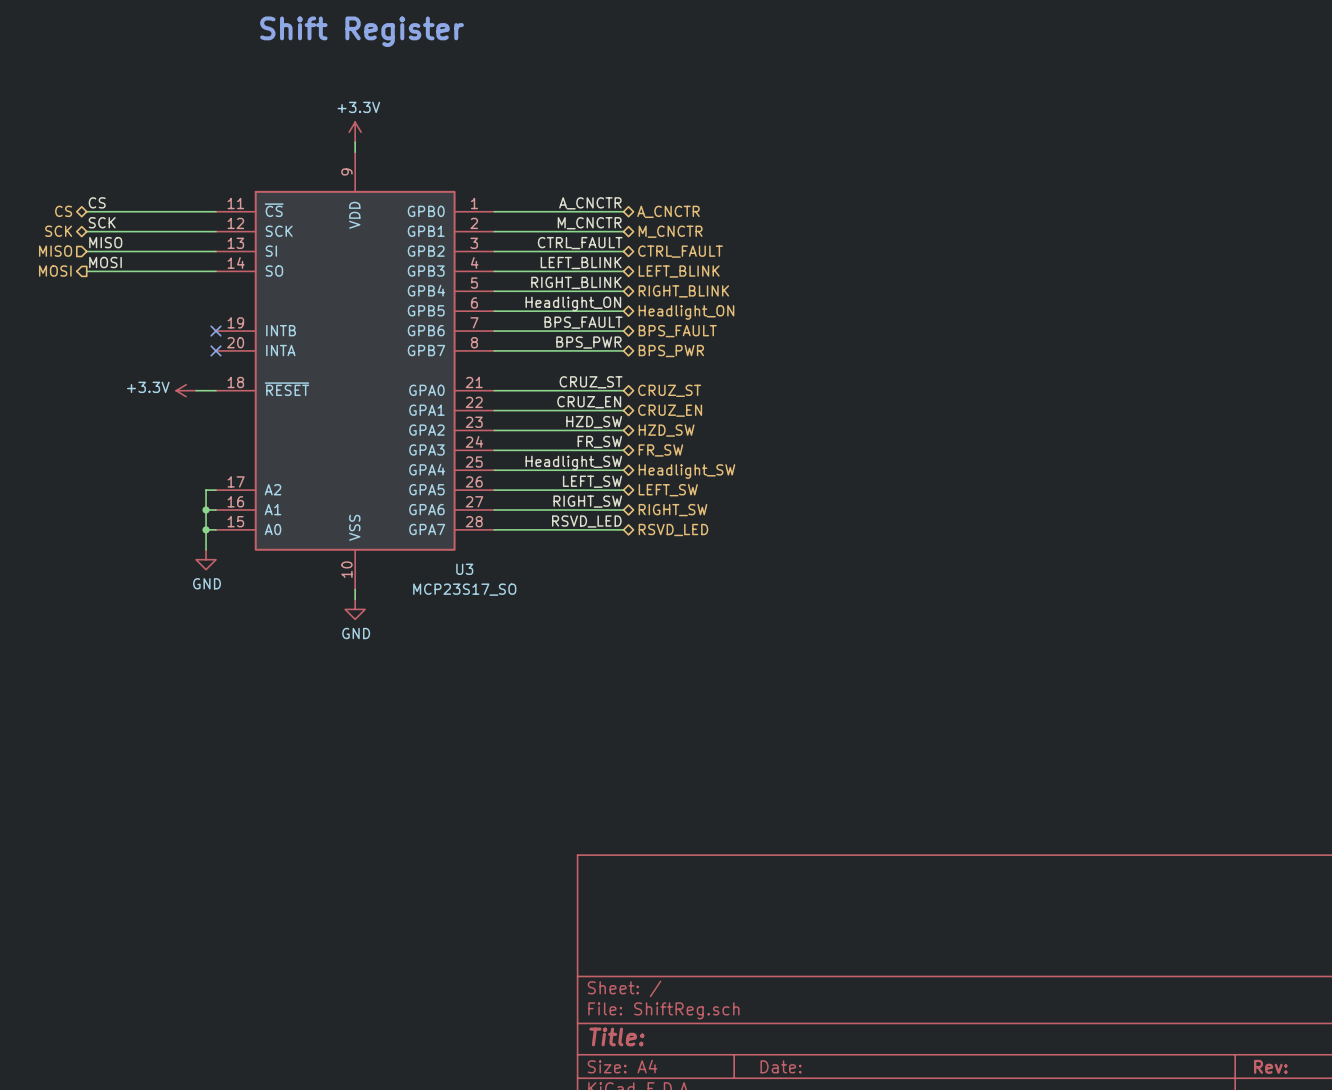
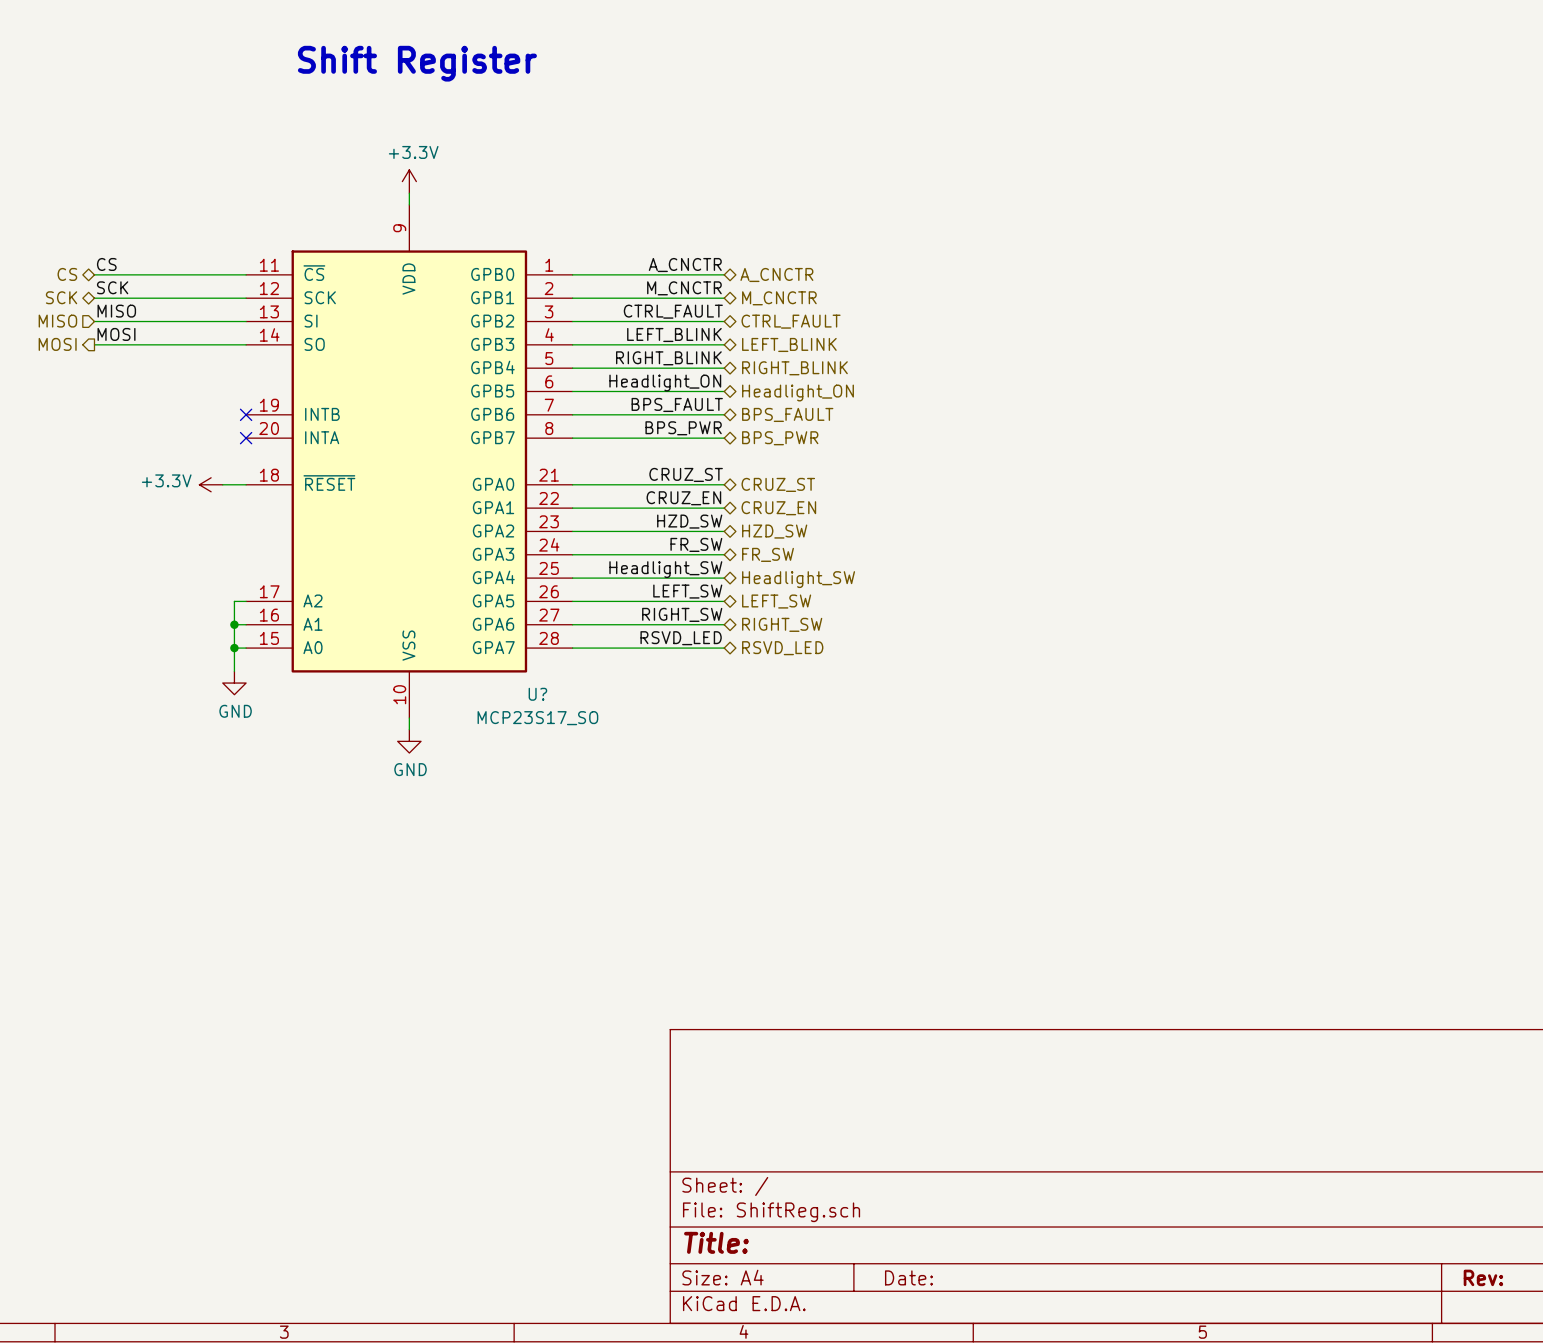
U3 name: U3 (464, 569) -> U? (537, 694)

